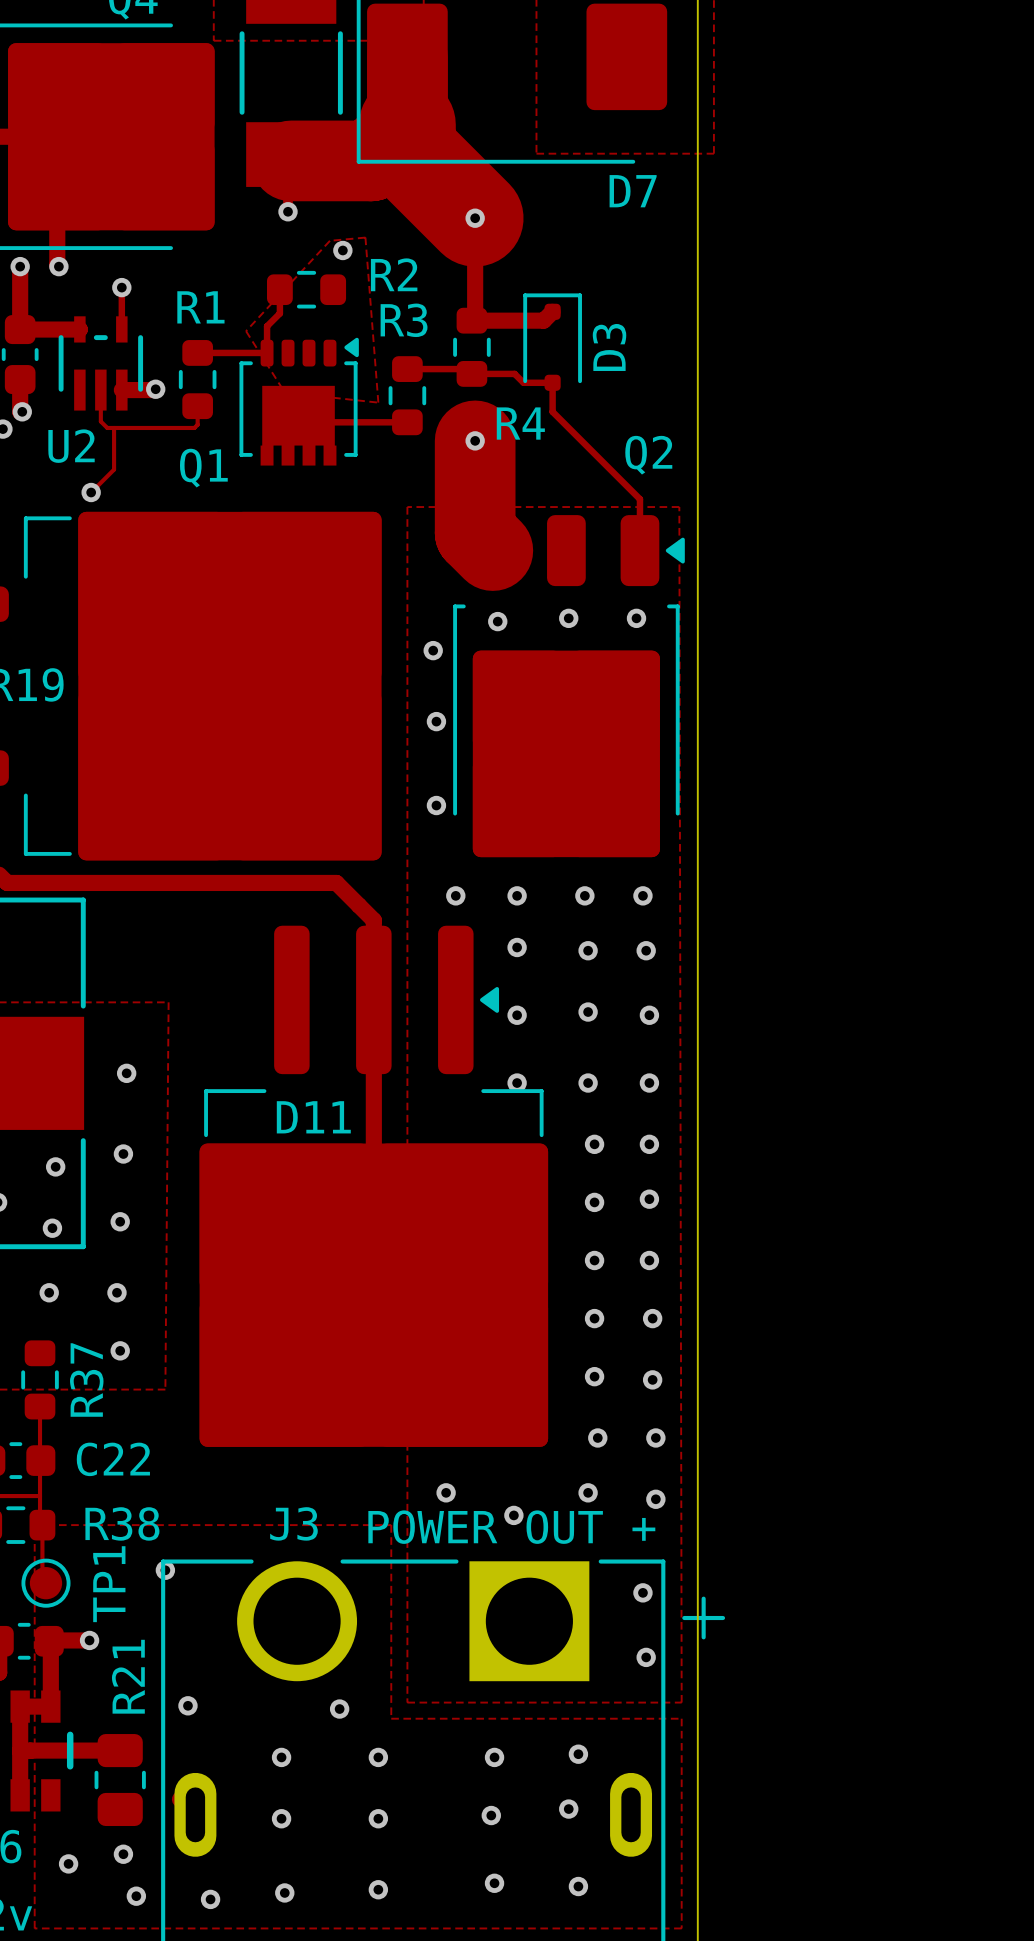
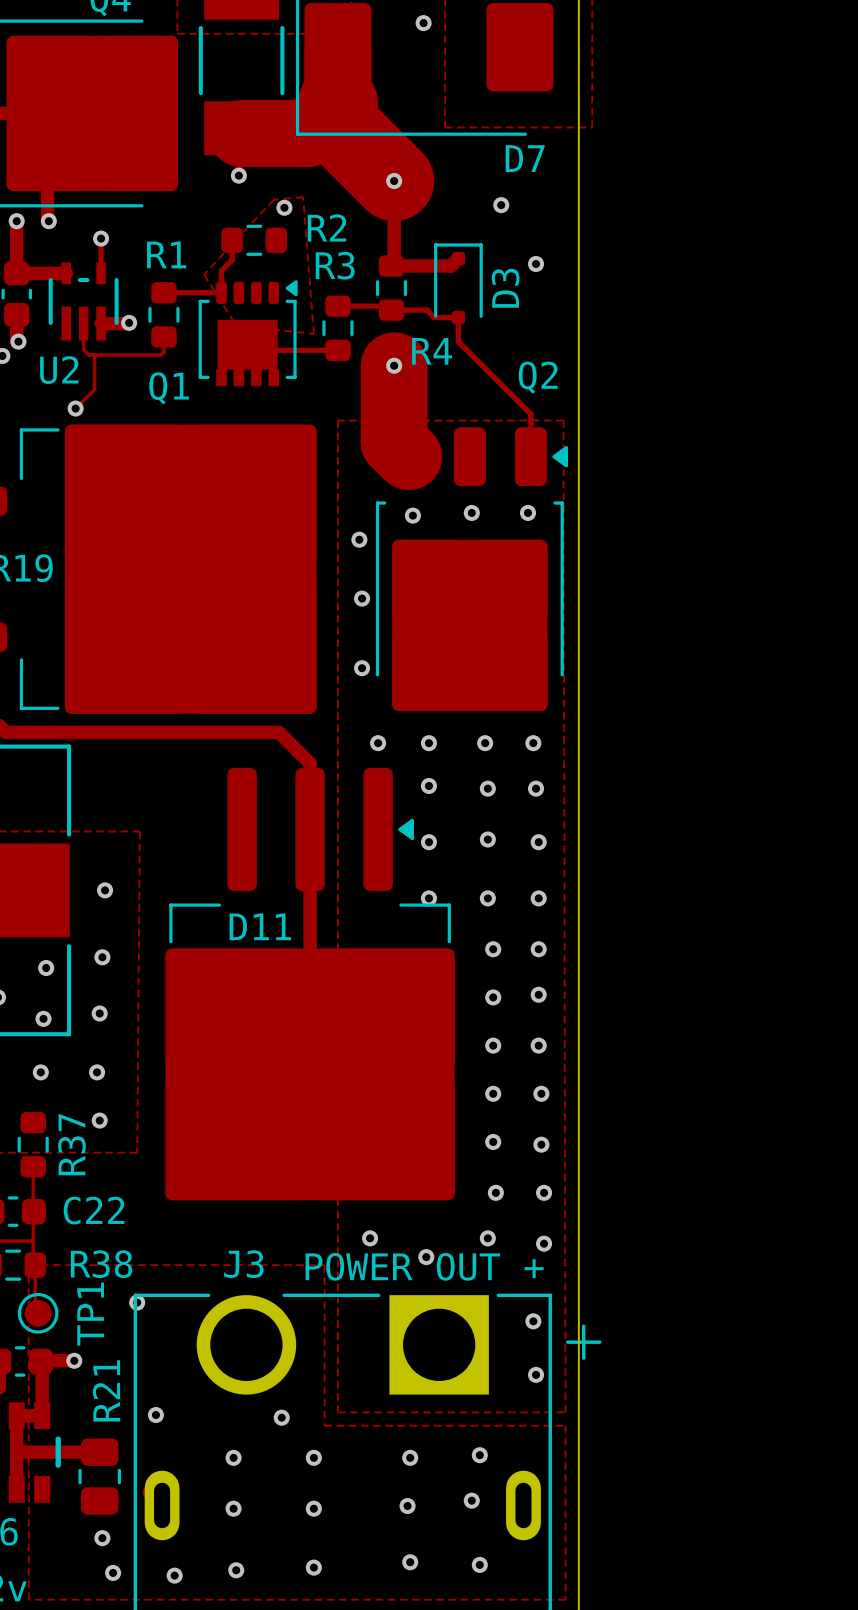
via: none -> (423, 23)
via: none -> (501, 205)
via: none -> (536, 264)
via: (68, 1863) -> none

